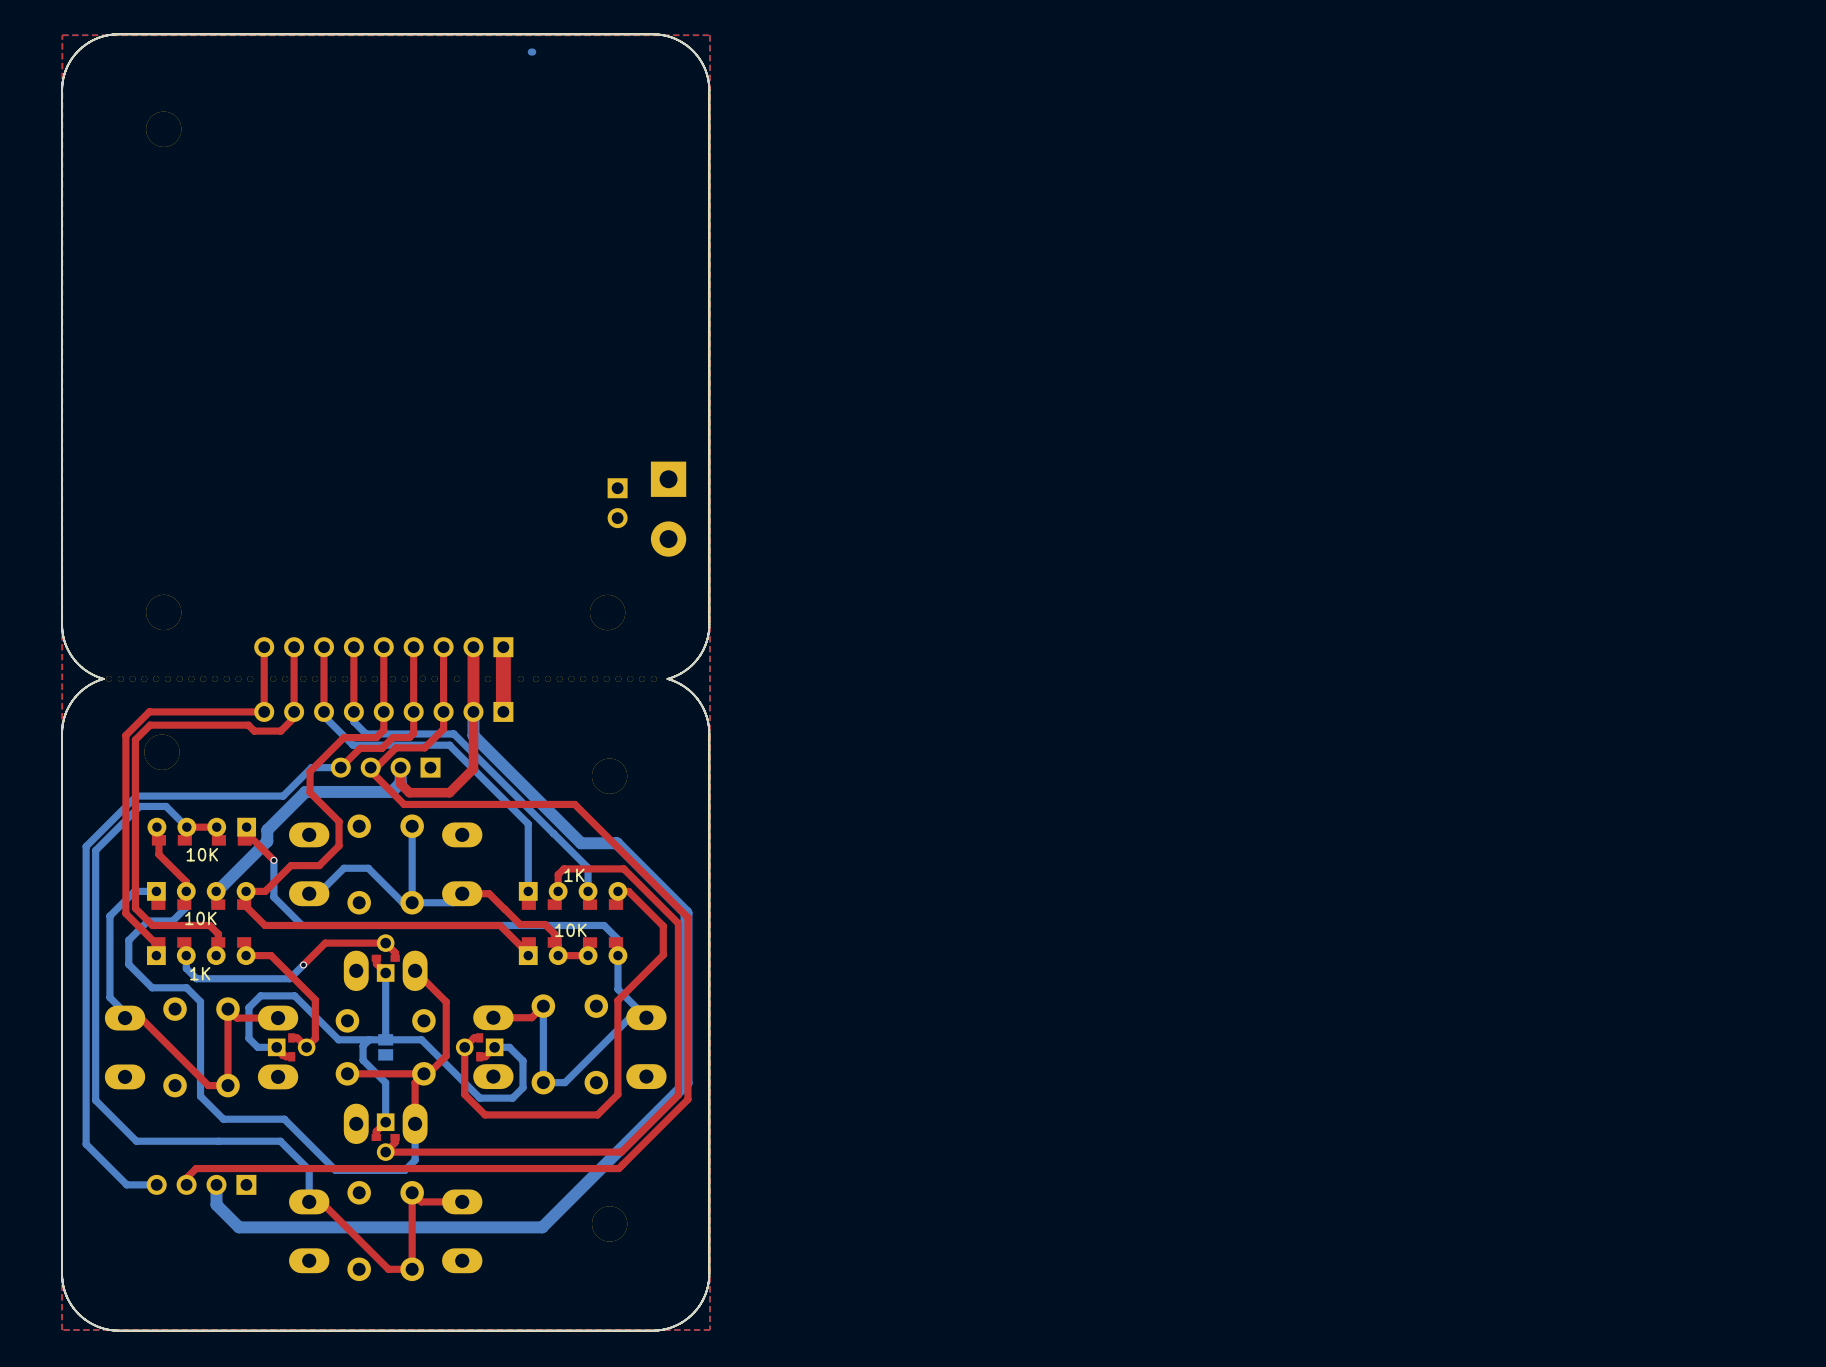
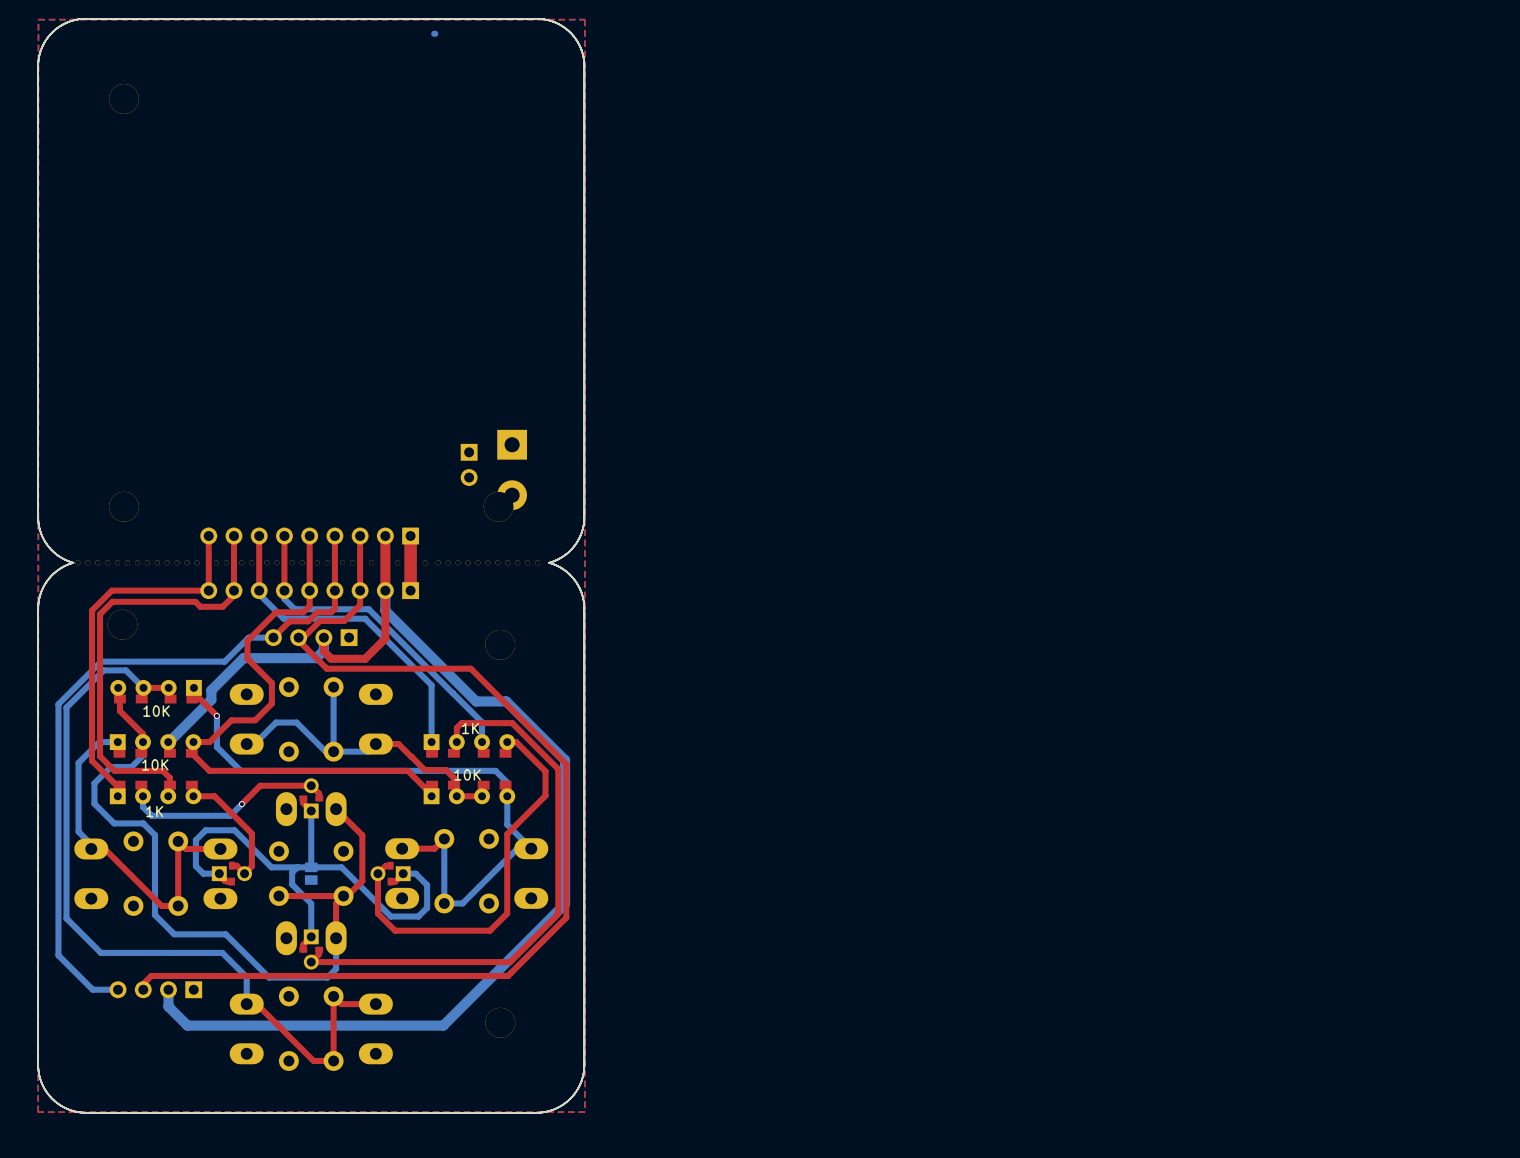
part position: (617, 503) -> (469, 464)
part position: (668, 509) -> (512, 469)

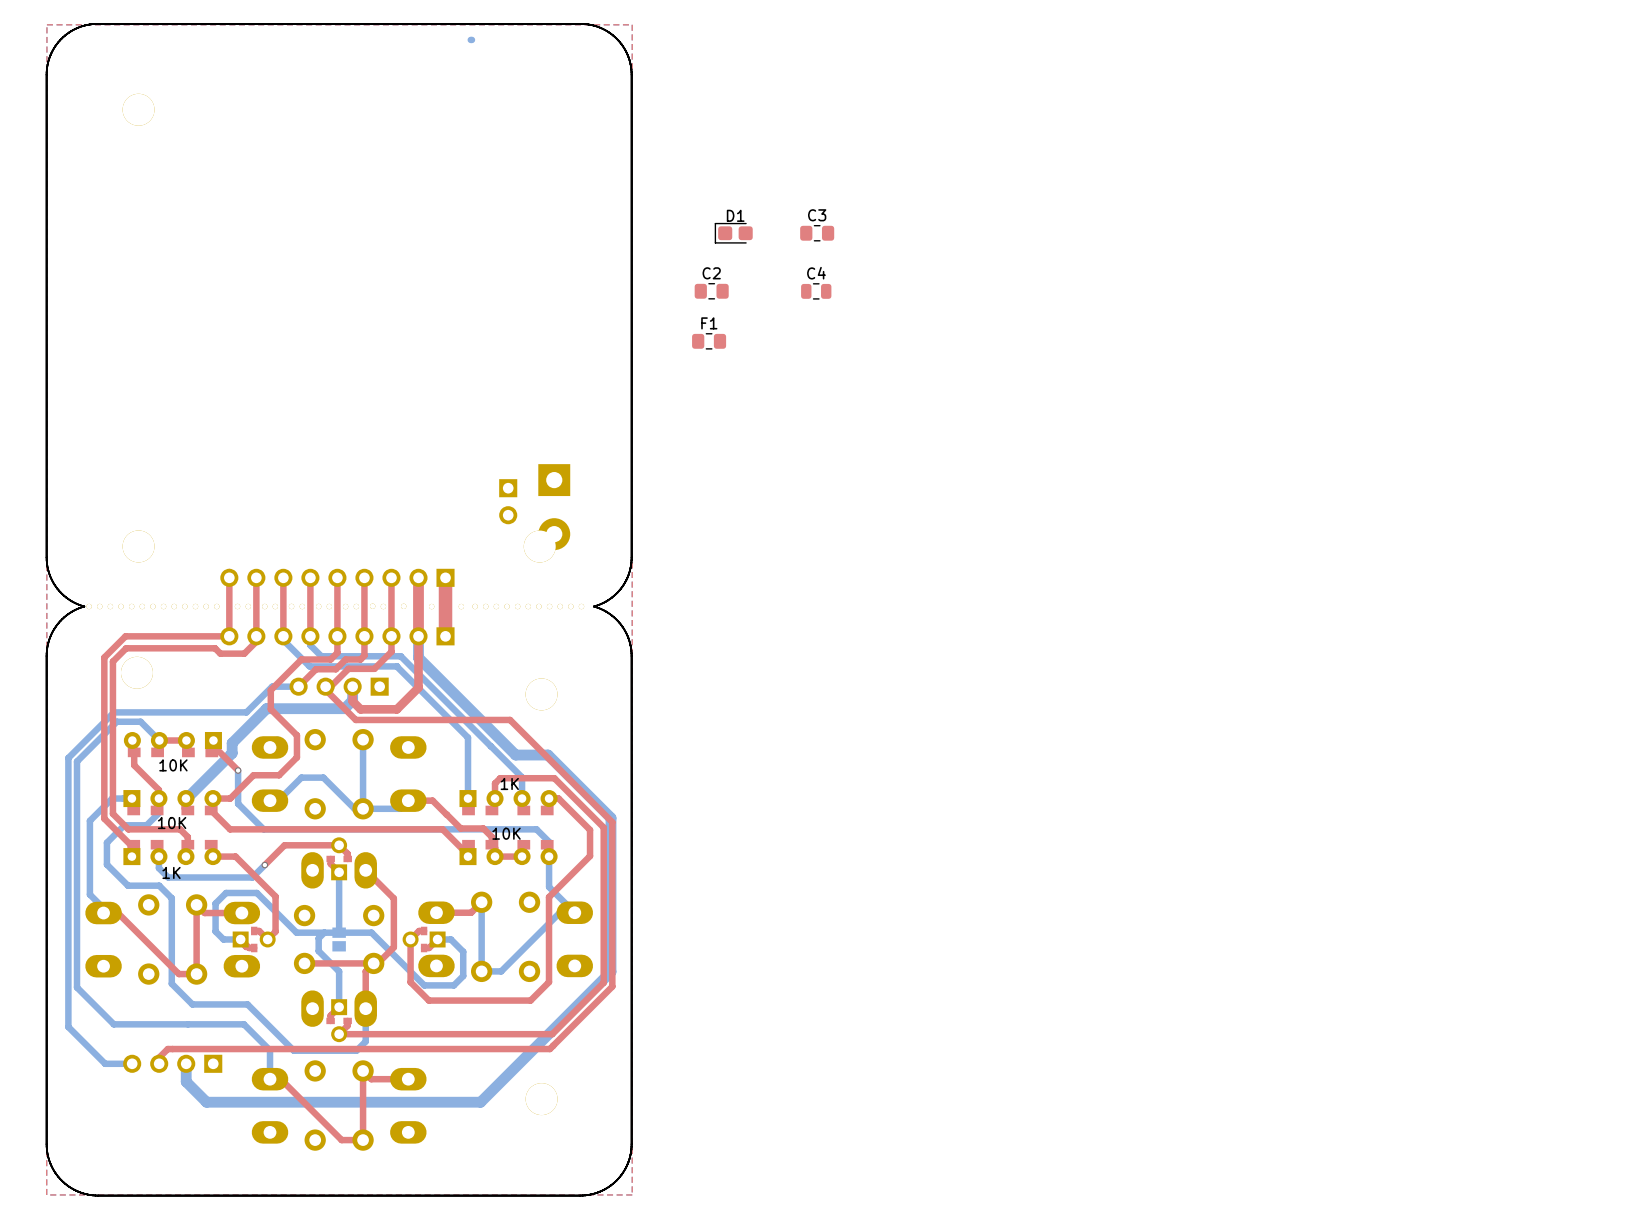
D1: none -> (733, 233)
C3: none -> (817, 233)
C2: none -> (711, 291)
C4: none -> (816, 291)
F1: none -> (709, 341)

